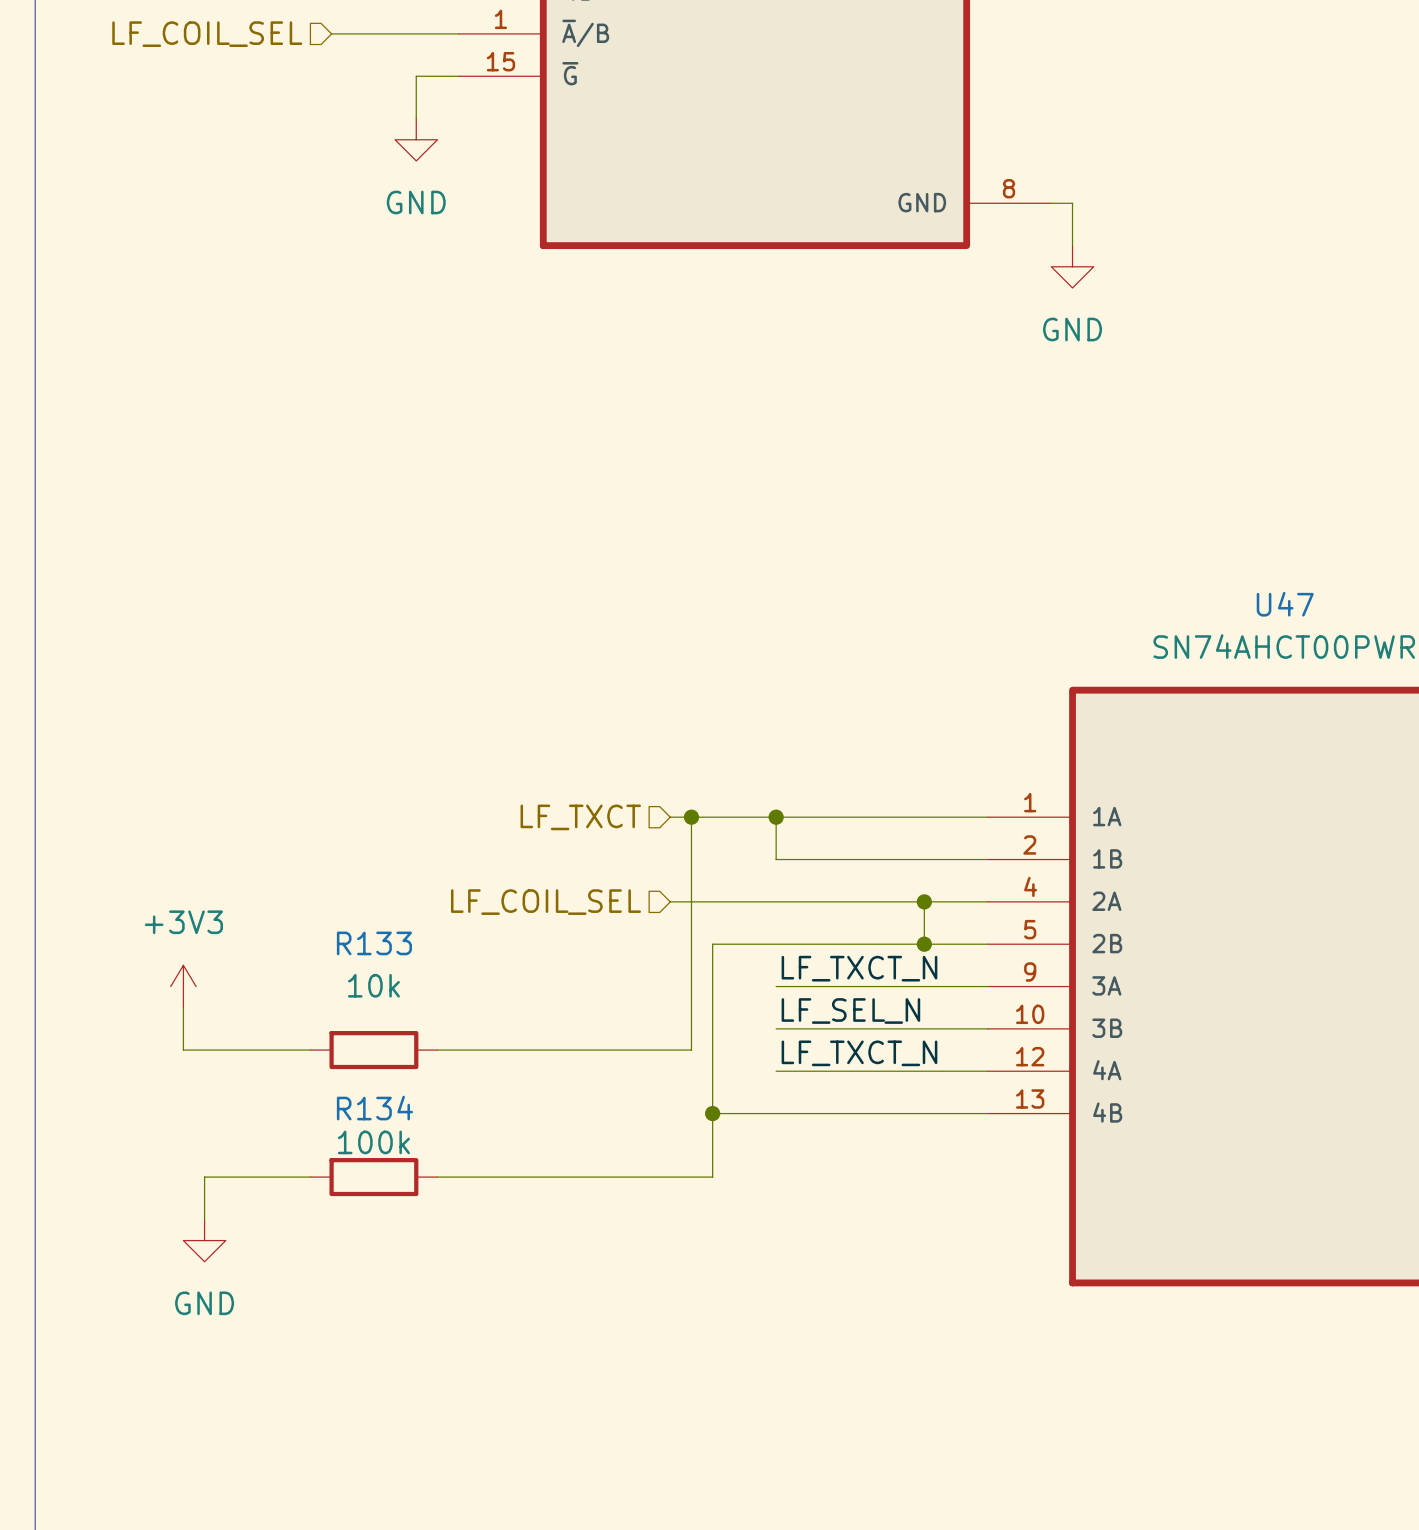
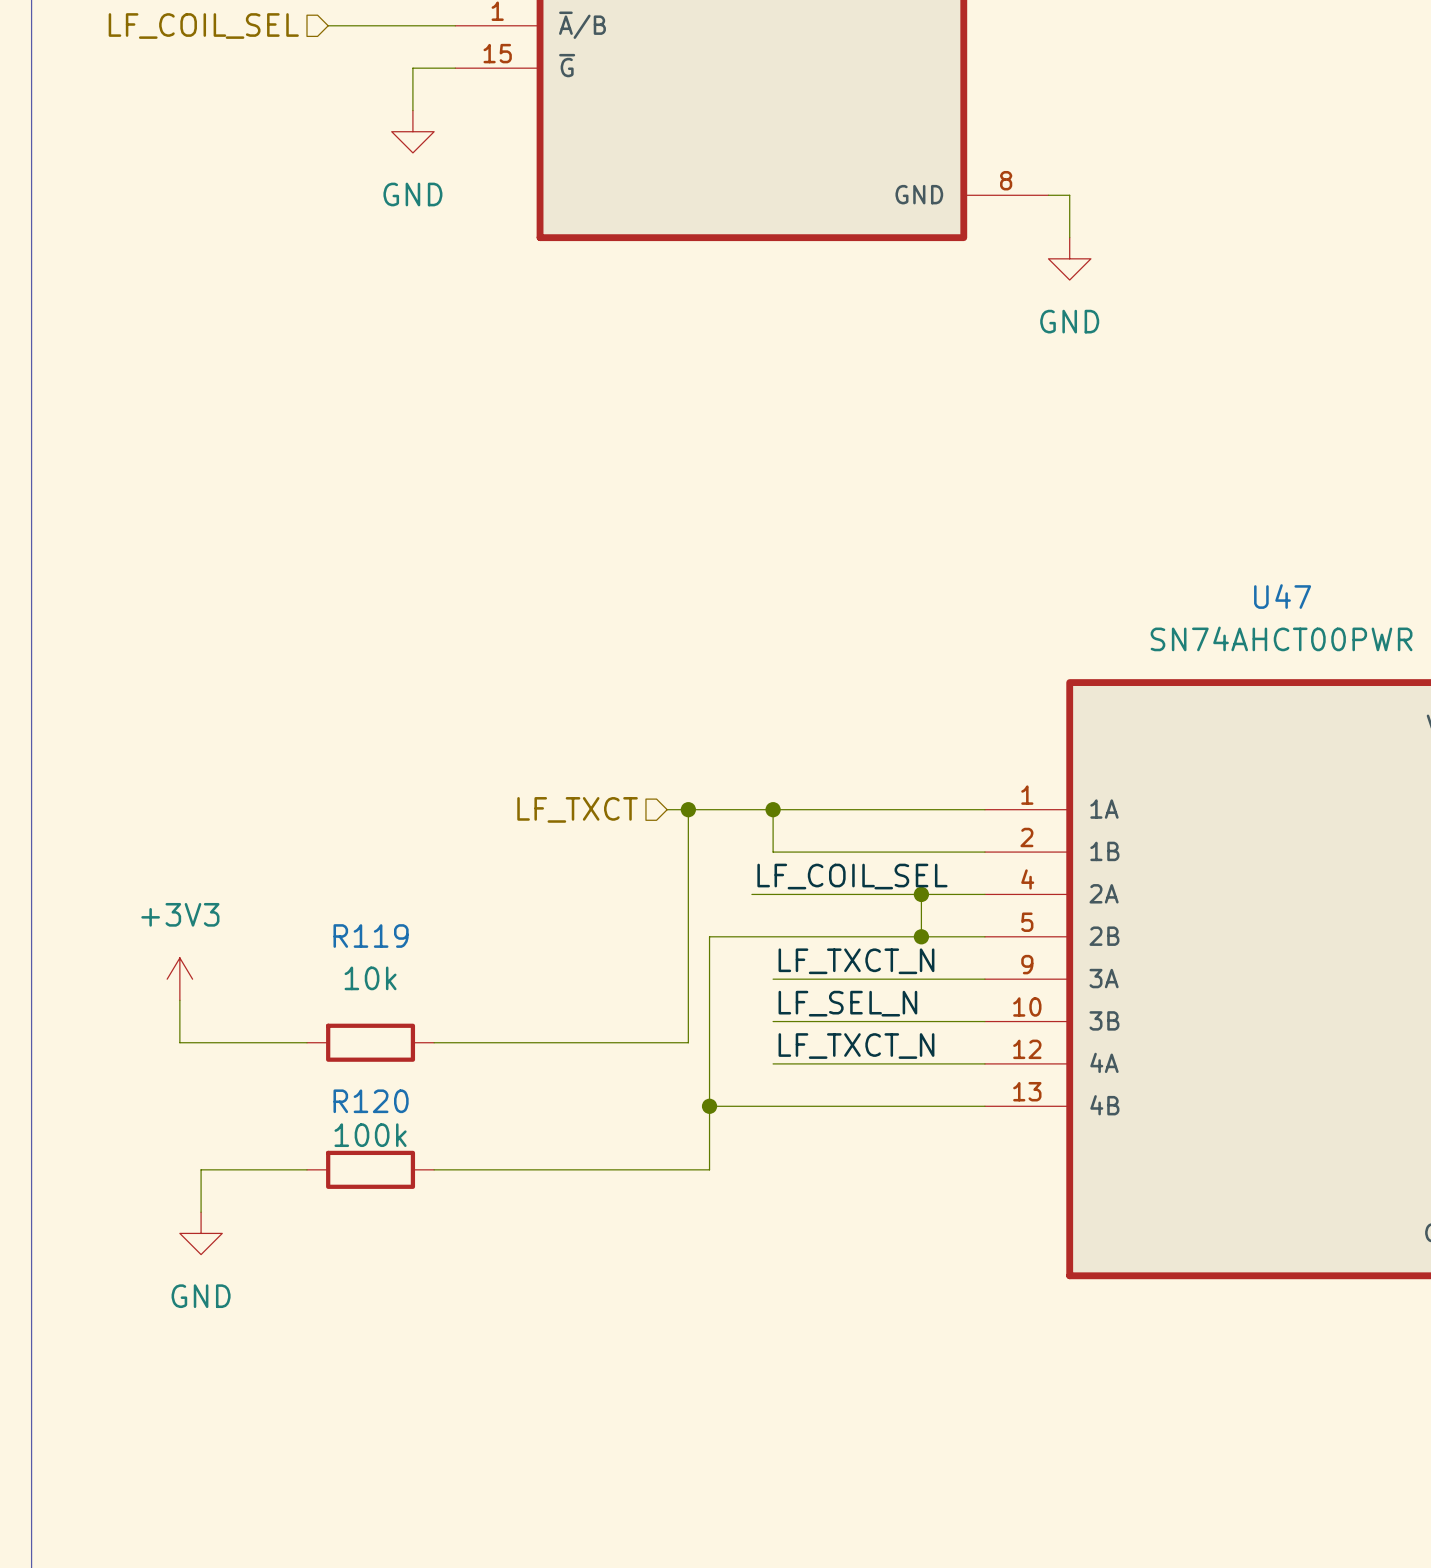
label: none -> LF_COIL_SEL (852, 876)
wire: (670, 901) (754, 901) -> none
hierarchical label: LF_COIL_SEL (545, 902) -> none
R133 name: R133 (374, 943) -> R119 (371, 936)
R134 name: R134 (374, 1108) -> R120 (371, 1101)

